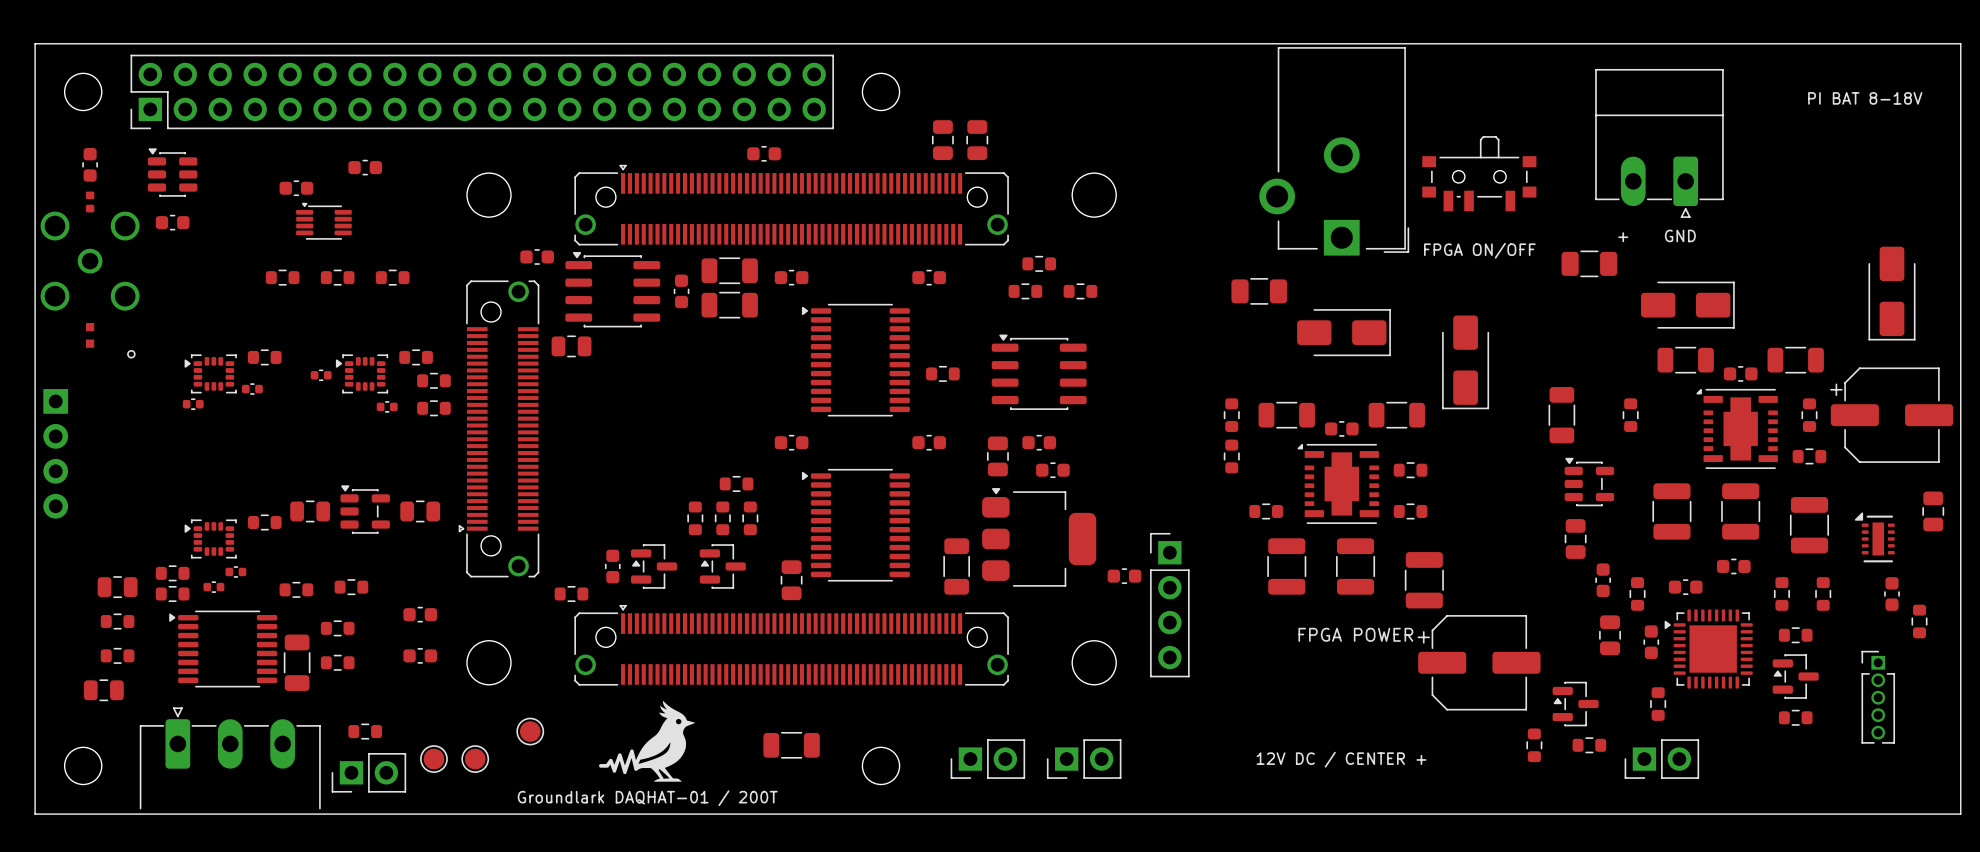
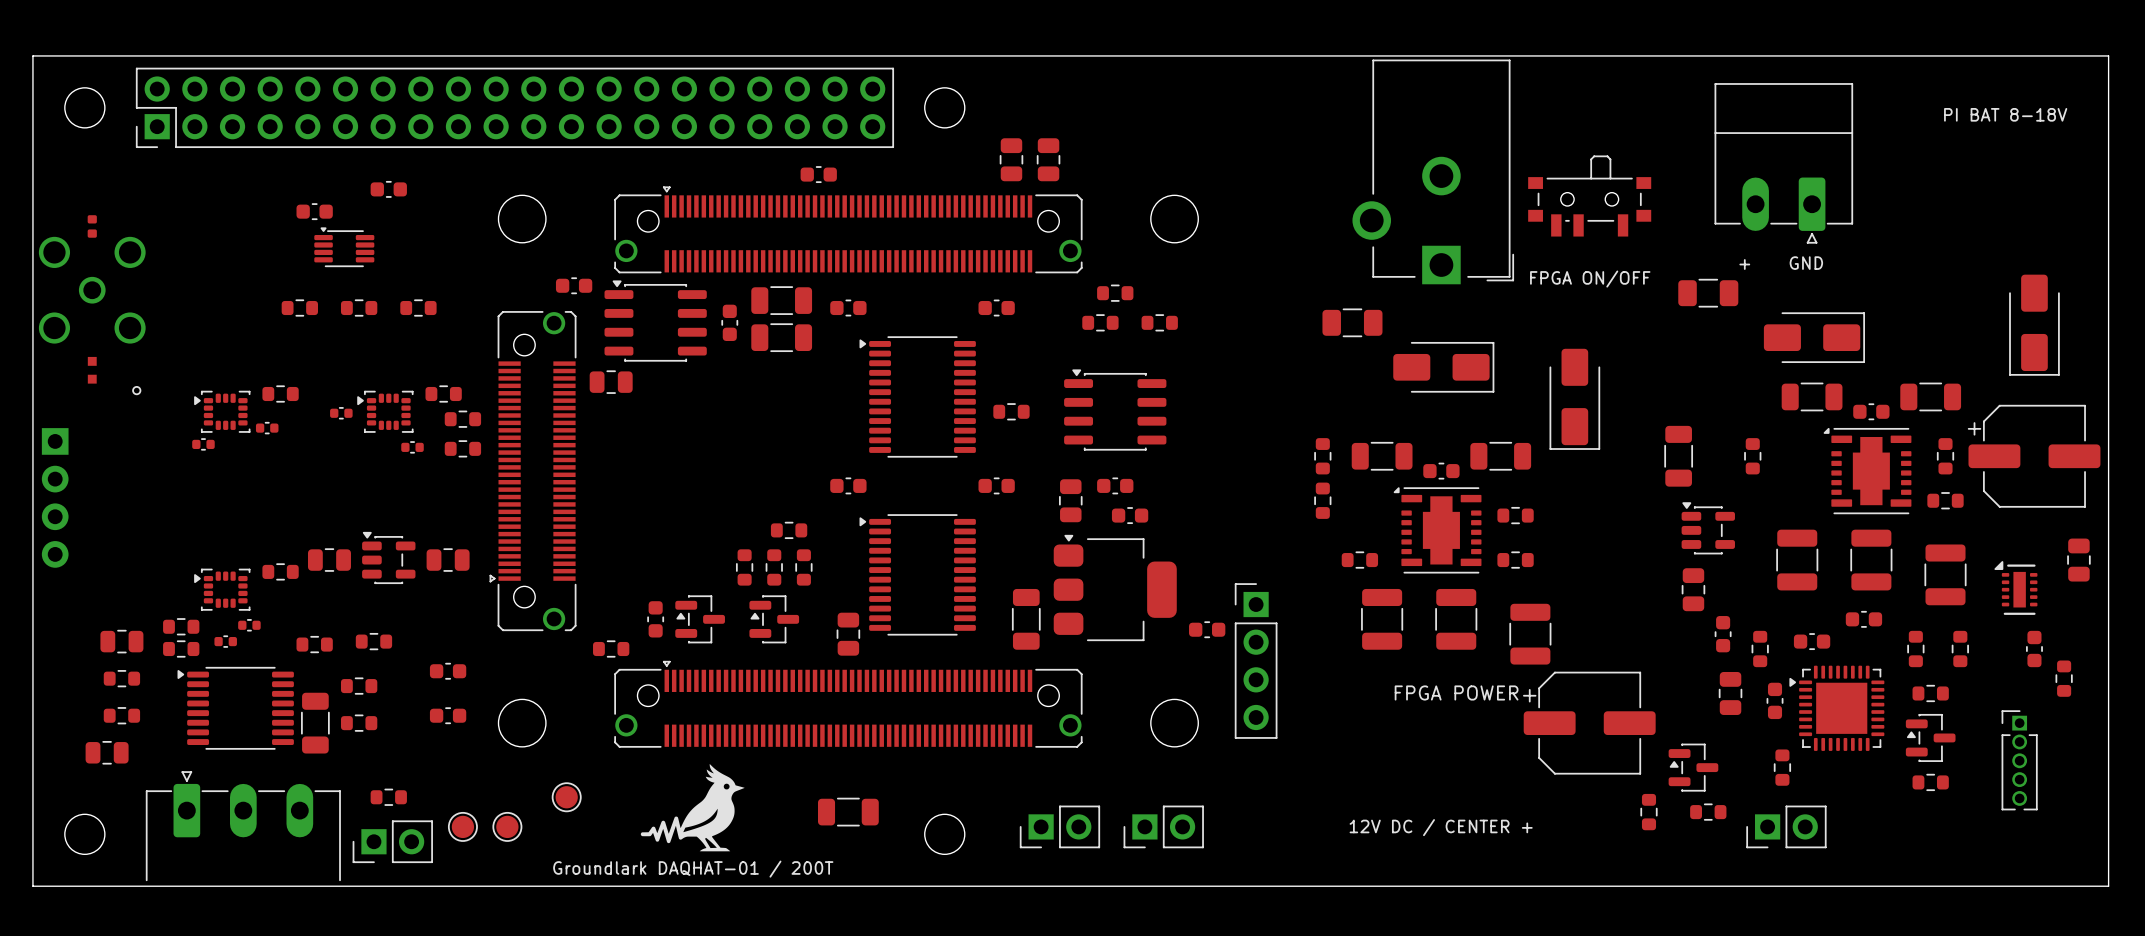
part: (90, 164) -> none
part: (172, 172) -> none
part: (172, 222) -> none

